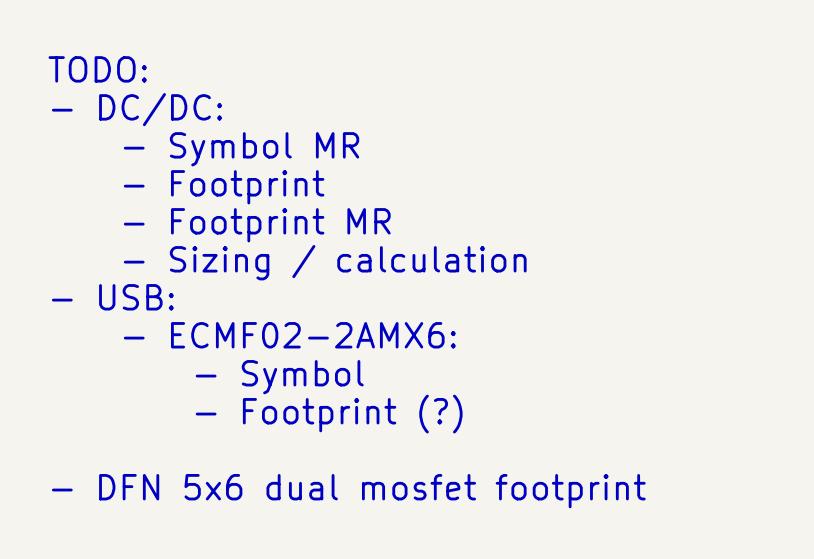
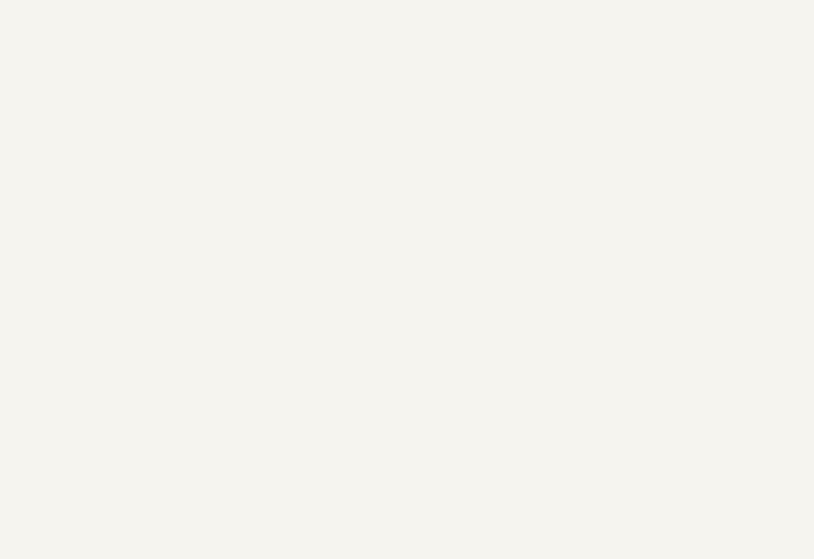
text: TODO: (97, 69) -> none
text: - DC/DC: (137, 109) -> none
text: - Symbol MR (241, 149) -> none
text: - Footprint (224, 187) -> none
text: - Footprint MR (257, 225) -> none
text: - Sizing / calculation (325, 262) -> none
text: - USB: (112, 297) -> none
text: - ECMF02-2AMX6: (289, 335) -> none
text: - Symbol (279, 377) -> none
text: - Footprint (?) (329, 414) -> none
text: - DFN 5x6 dual mosfet footprint (348, 491) -> none

